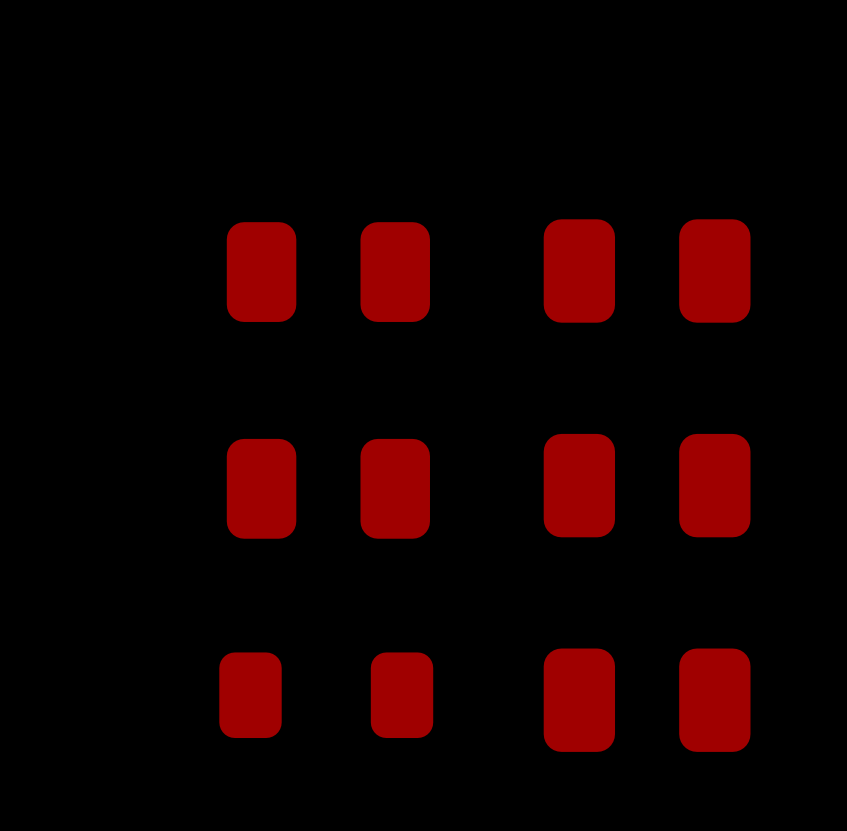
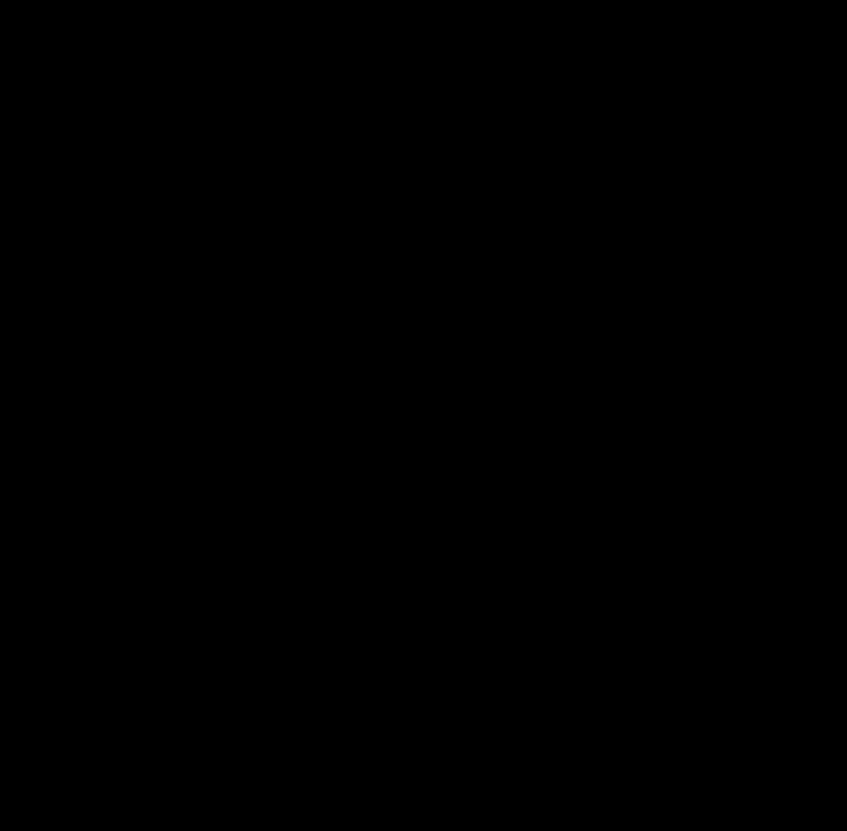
part: (647, 271) -> none
part: (328, 272) -> none
part: (647, 485) -> none
part: (328, 488) -> none
part: (326, 695) -> none
part: (647, 700) -> none

